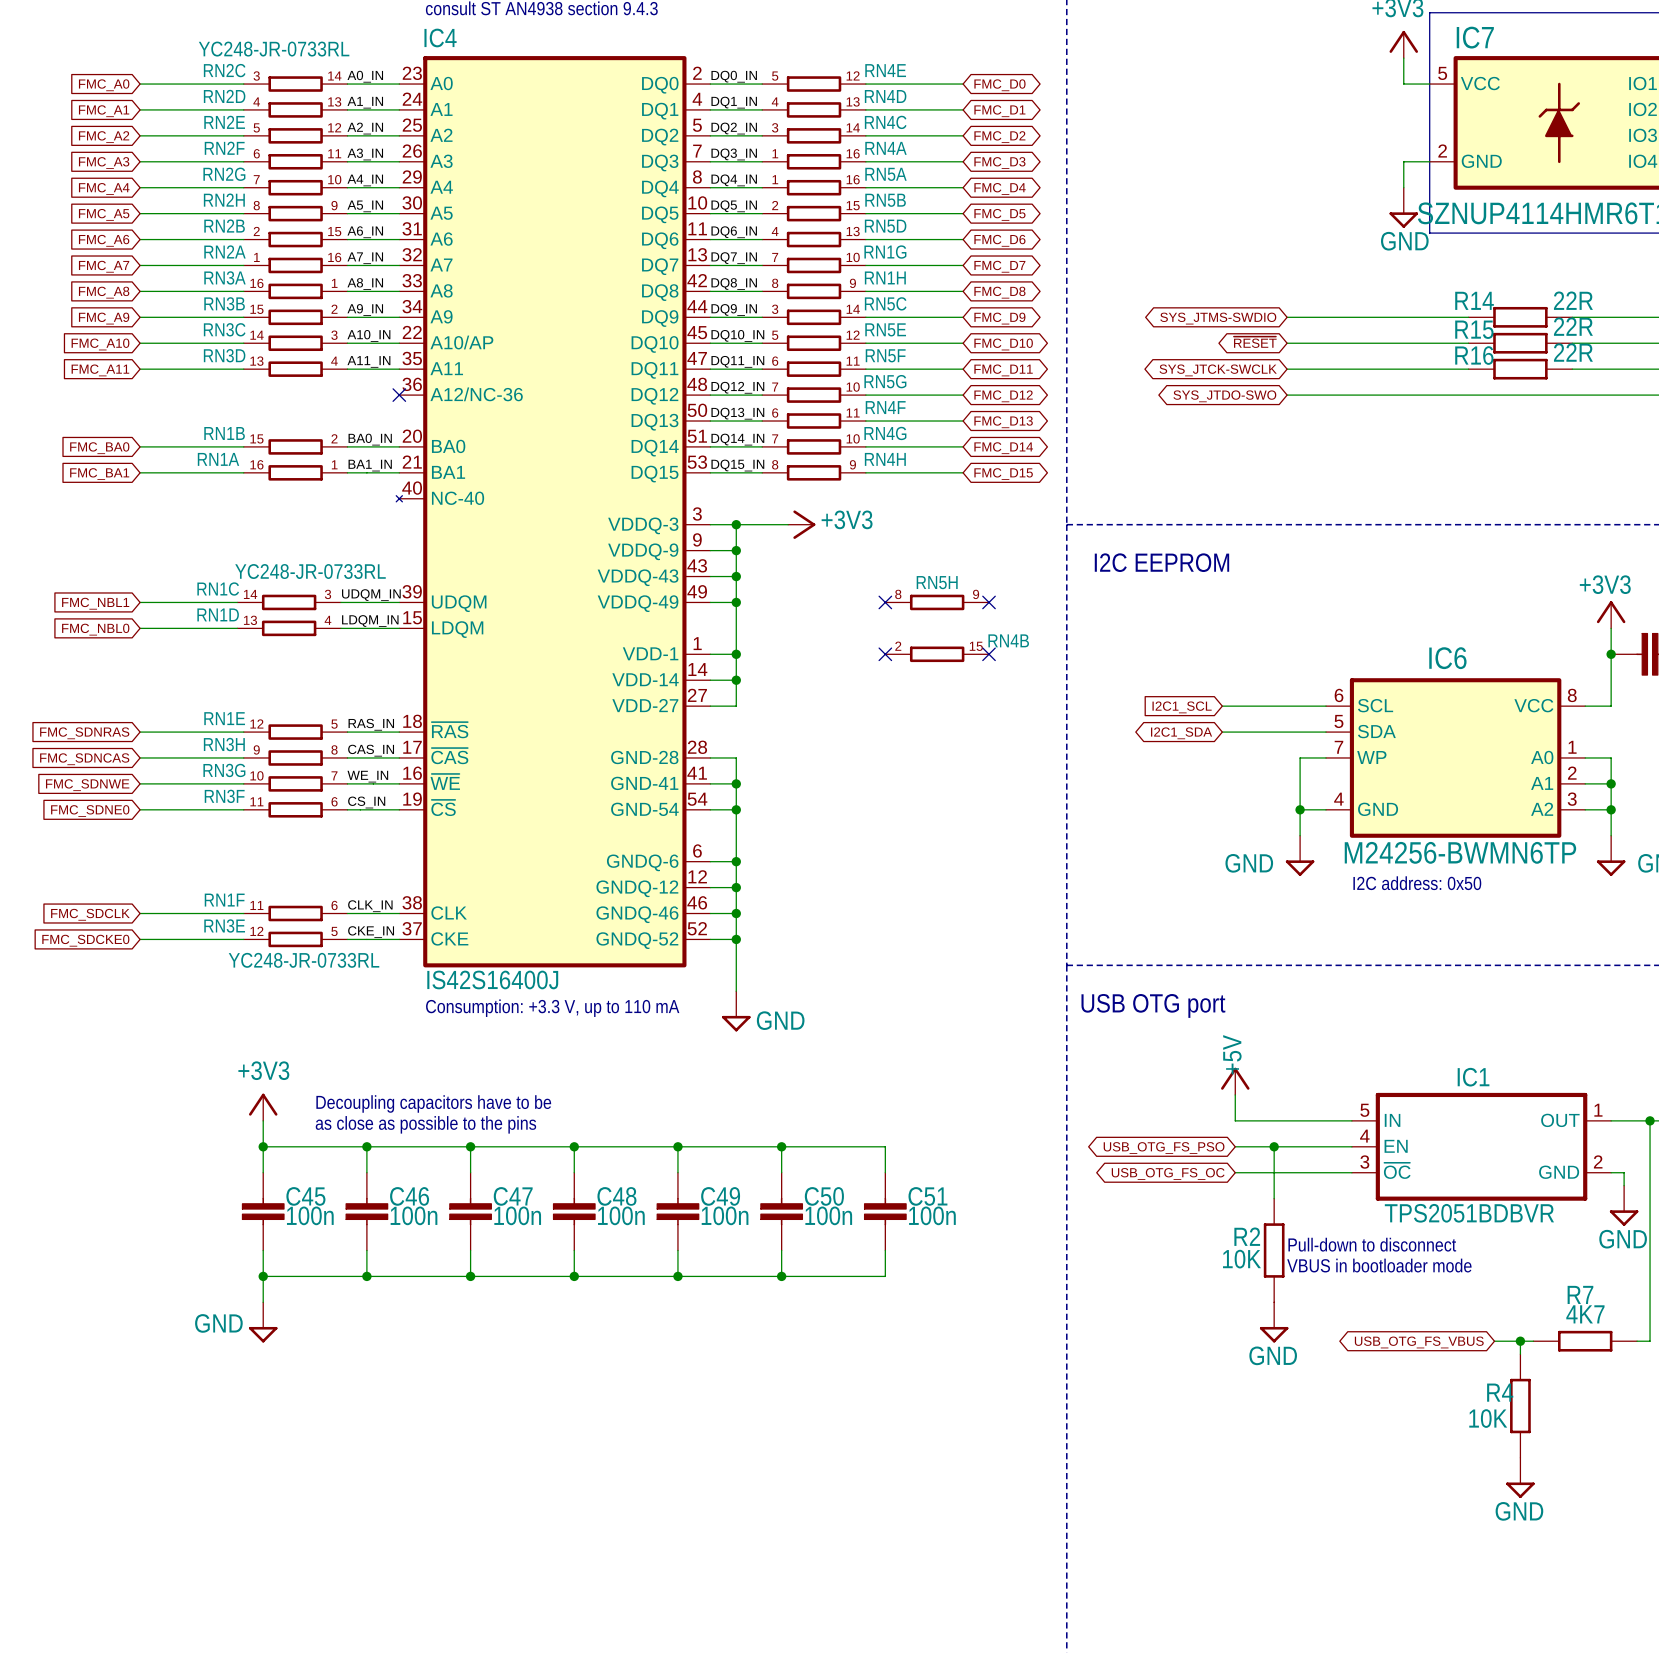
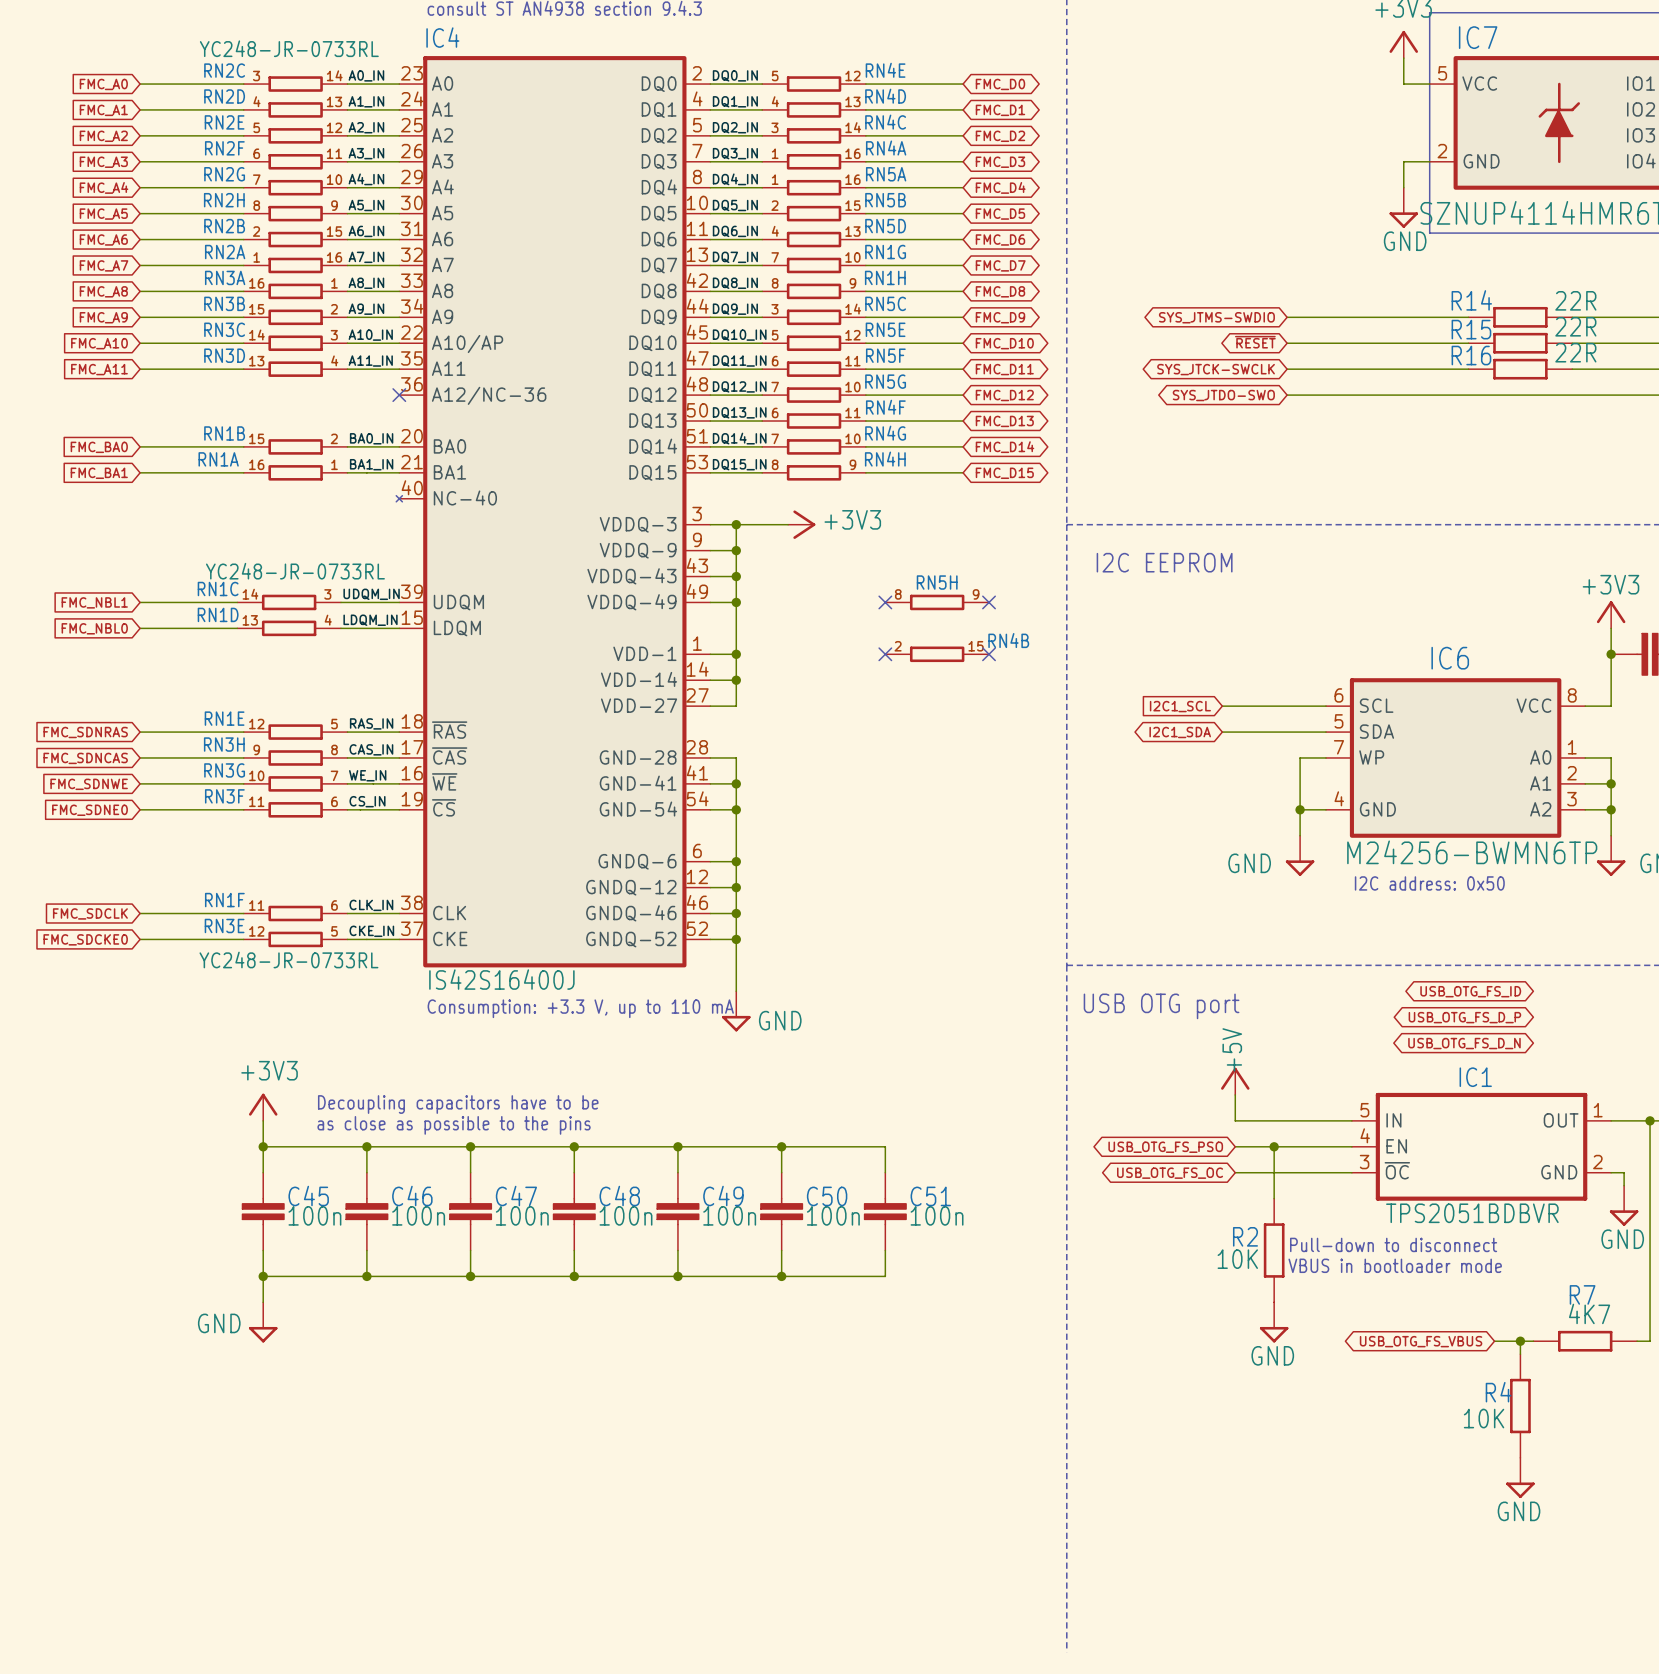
global label: none -> USB_OTG_FS_ID (1470, 991)
global label: none -> USB_OTG_FS_D_P (1464, 1017)
global label: none -> USB_OTG_FS_D_N (1464, 1043)

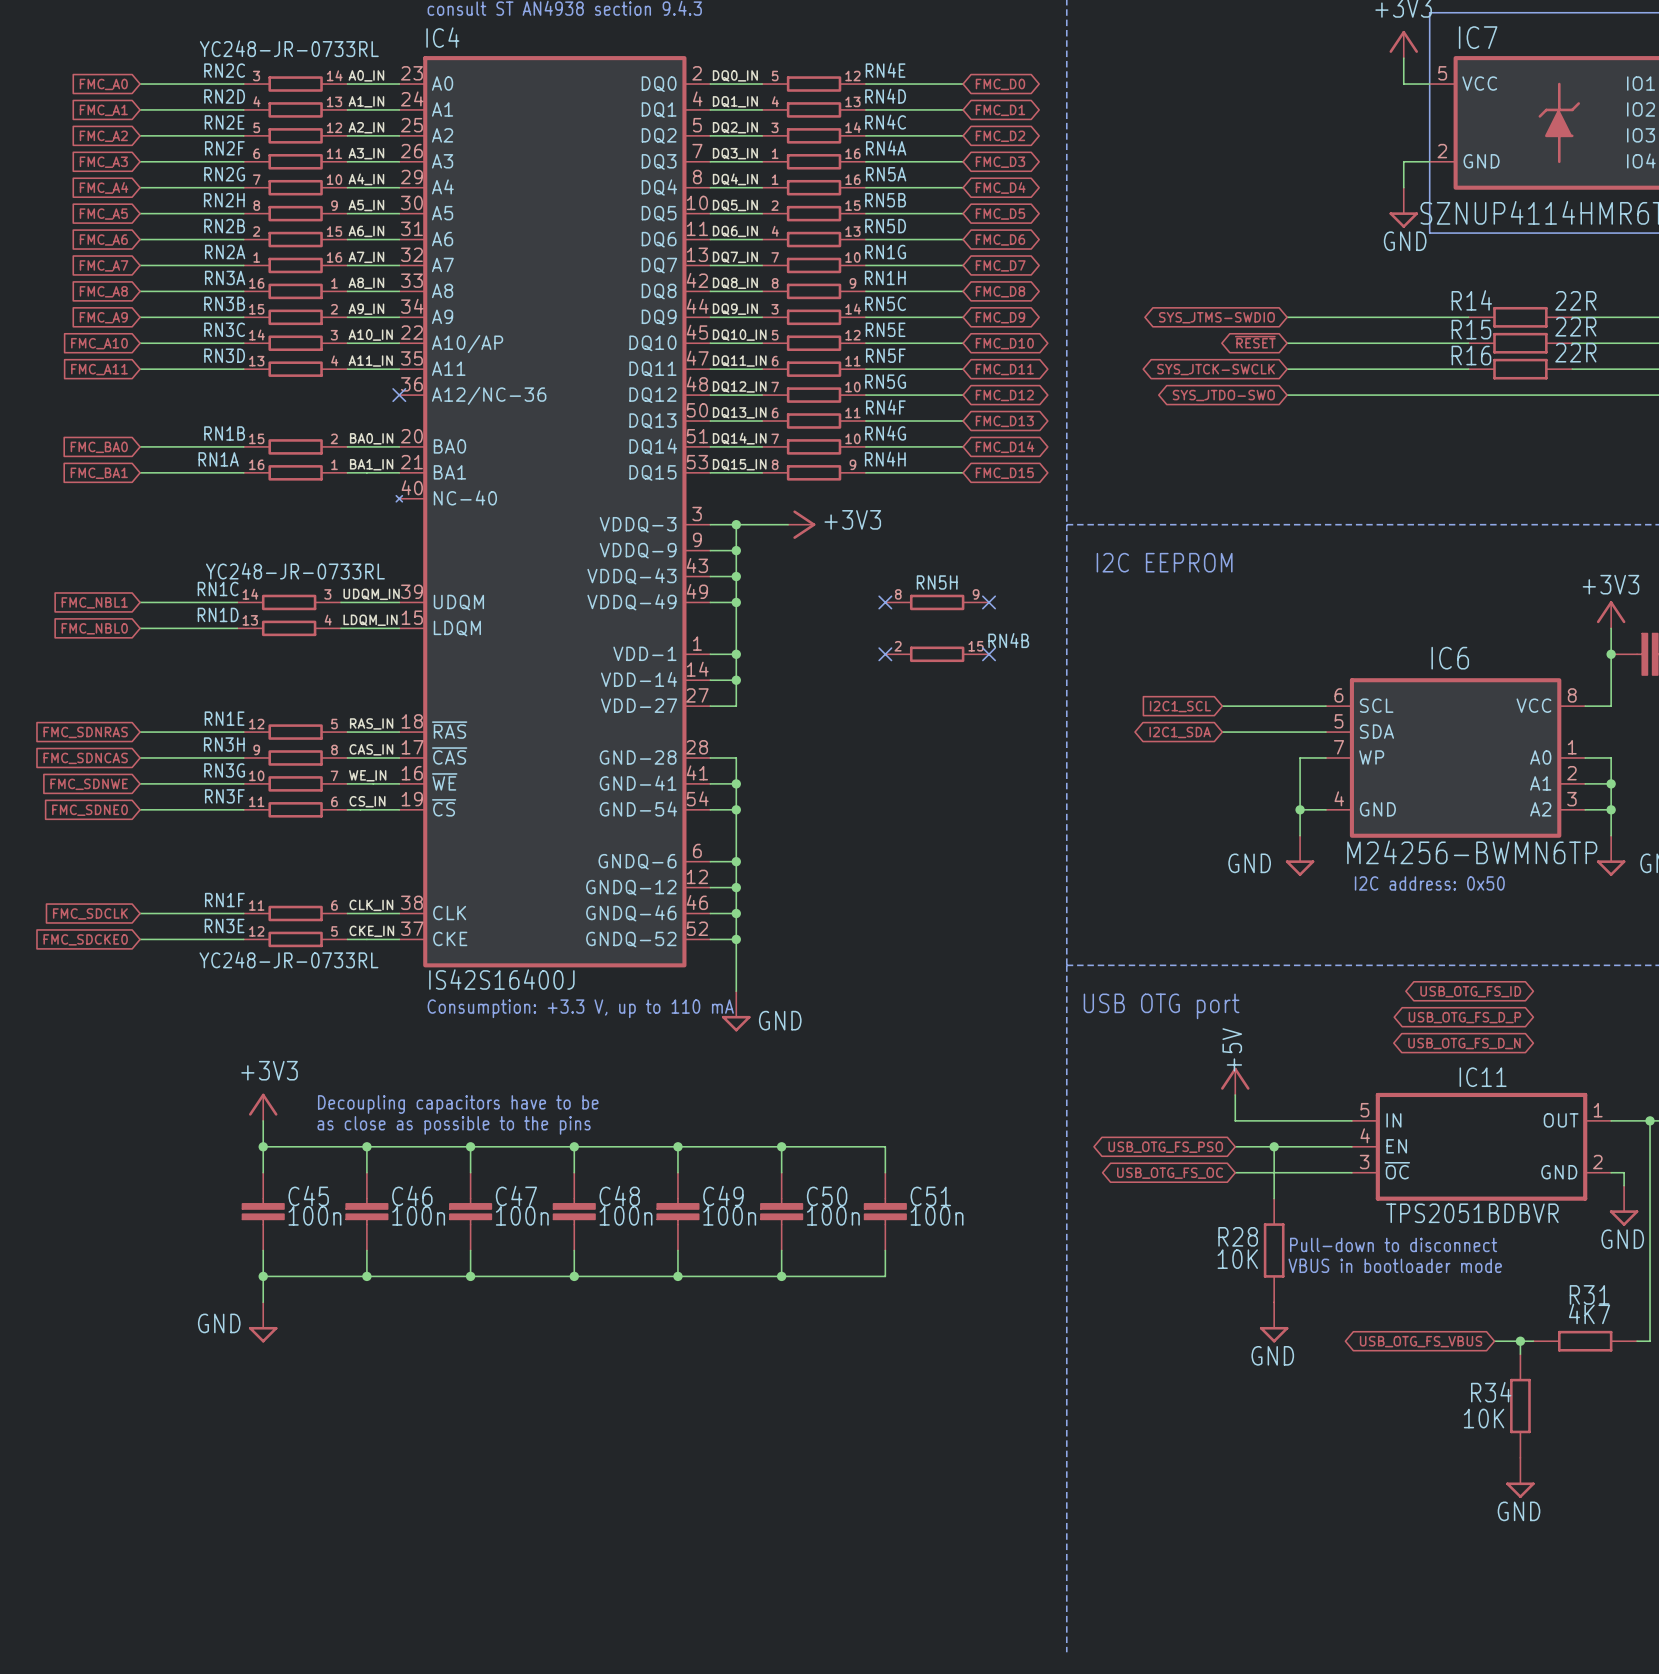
IC1 name: IC1 (1475, 1077) -> IC11 (1483, 1077)
R2 name: R2 (1245, 1236) -> R28 (1238, 1236)
R7 name: R7 (1582, 1294) -> R31 (1589, 1294)
R4 name: R4 (1498, 1392) -> R34 (1491, 1392)

